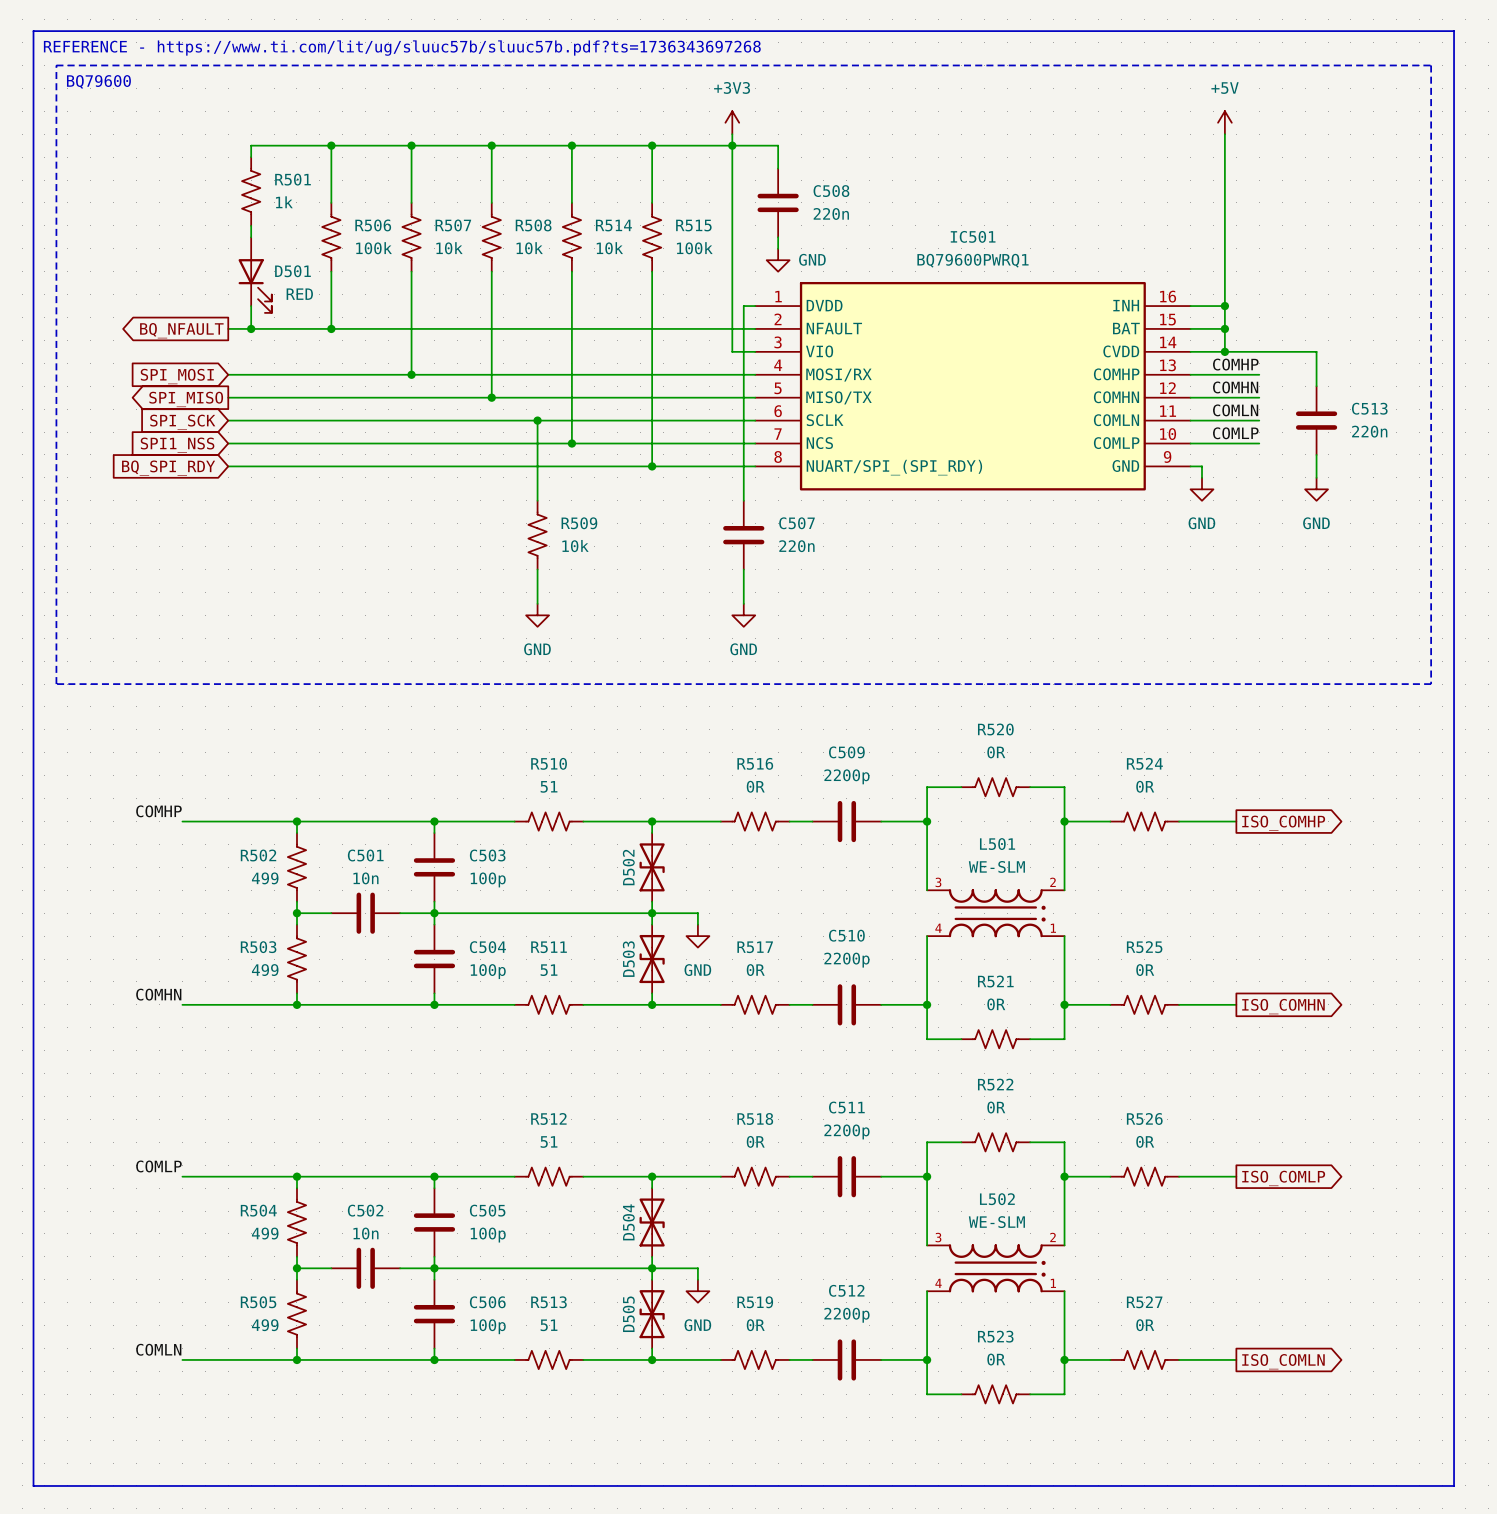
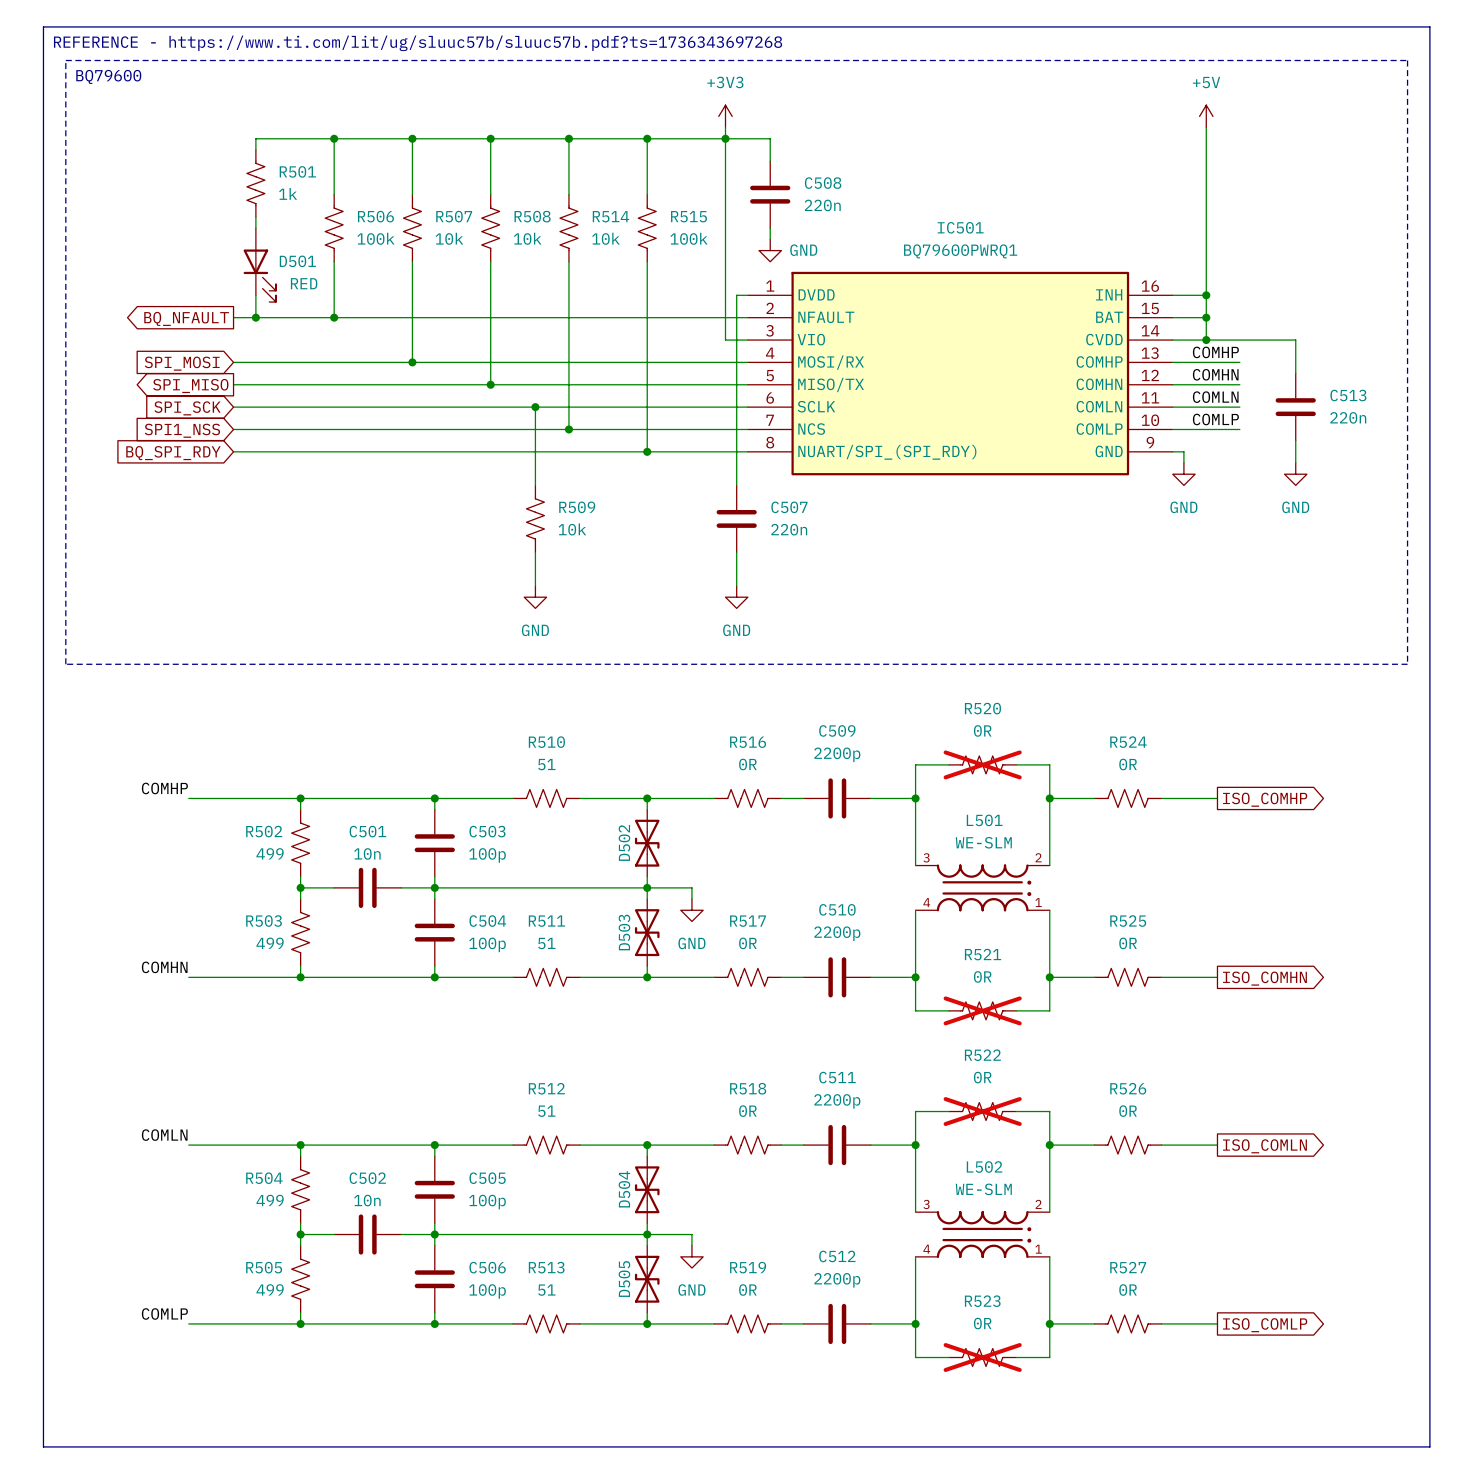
R520 do-not-place cross: none -> (982, 764)
R521 do-not-place cross: none -> (982, 1010)
R522 do-not-place cross: none -> (982, 1111)
label: COMLP (158, 1166) -> COMLN (164, 1135)
global label: ISO_COMLP (1283, 1178) -> ISO_COMLN (1264, 1146)
label: COMLN (158, 1349) -> COMLP (164, 1313)
global label: ISO_COMLN (1283, 1361) -> ISO_COMLP (1265, 1325)
R523 do-not-place cross: none -> (982, 1357)

